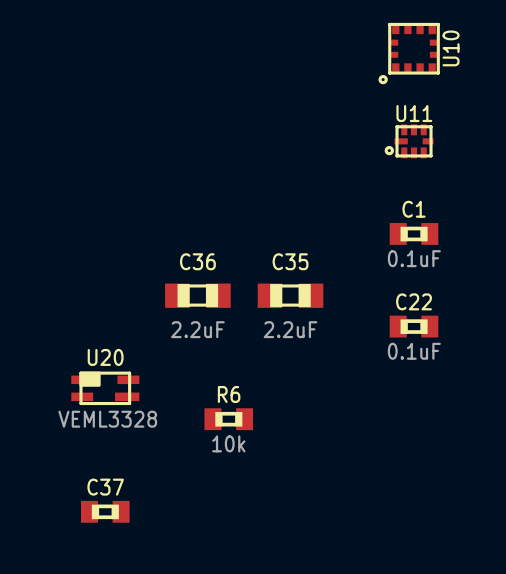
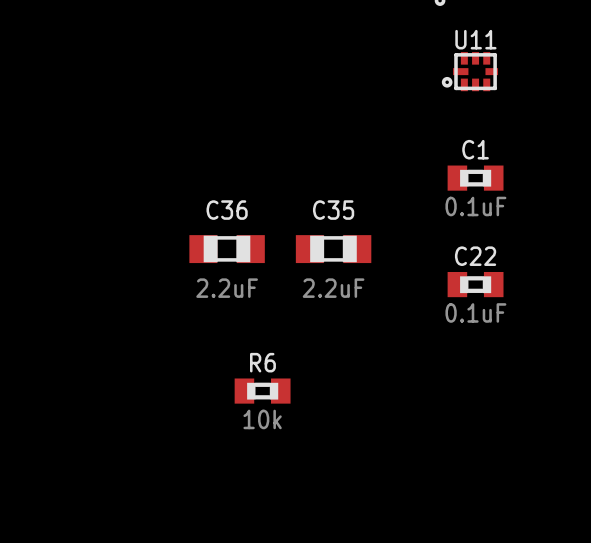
U20: VEML3328 (105, 388) -> none
C37: (105, 511) -> none

